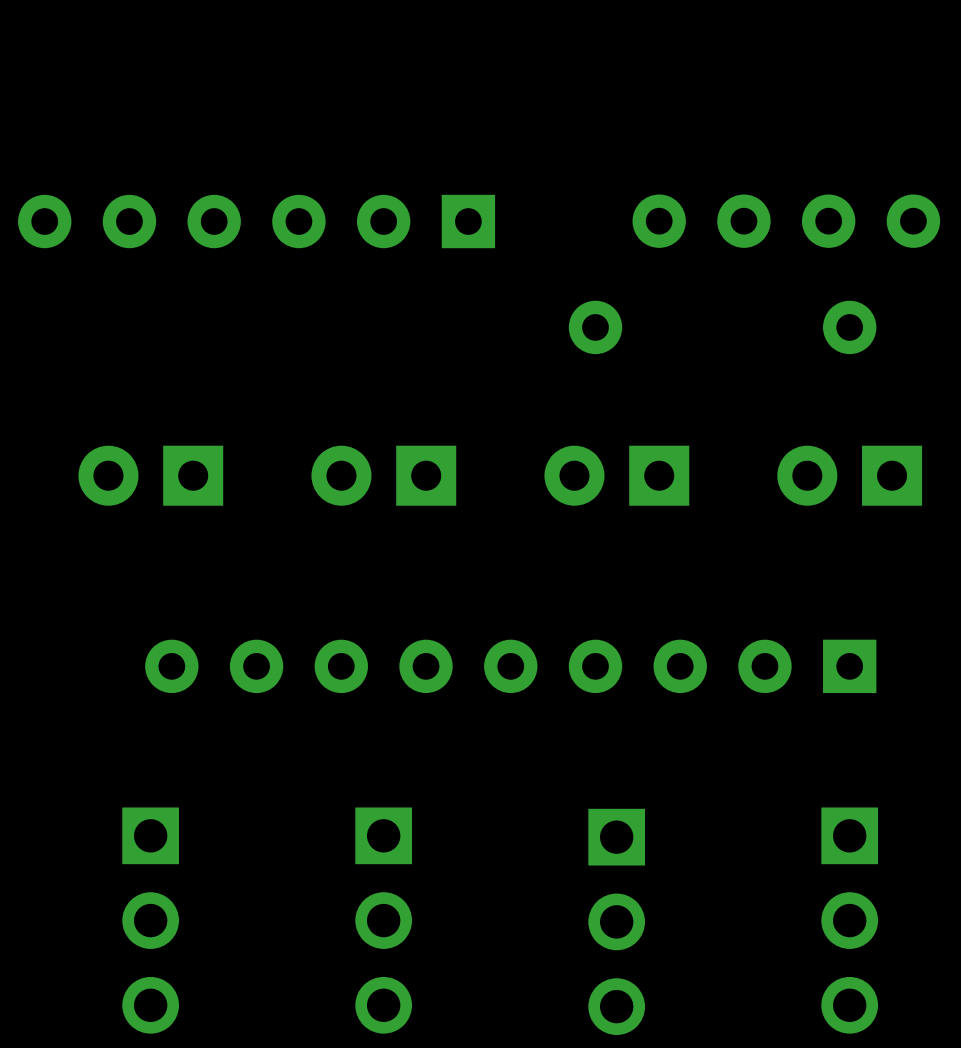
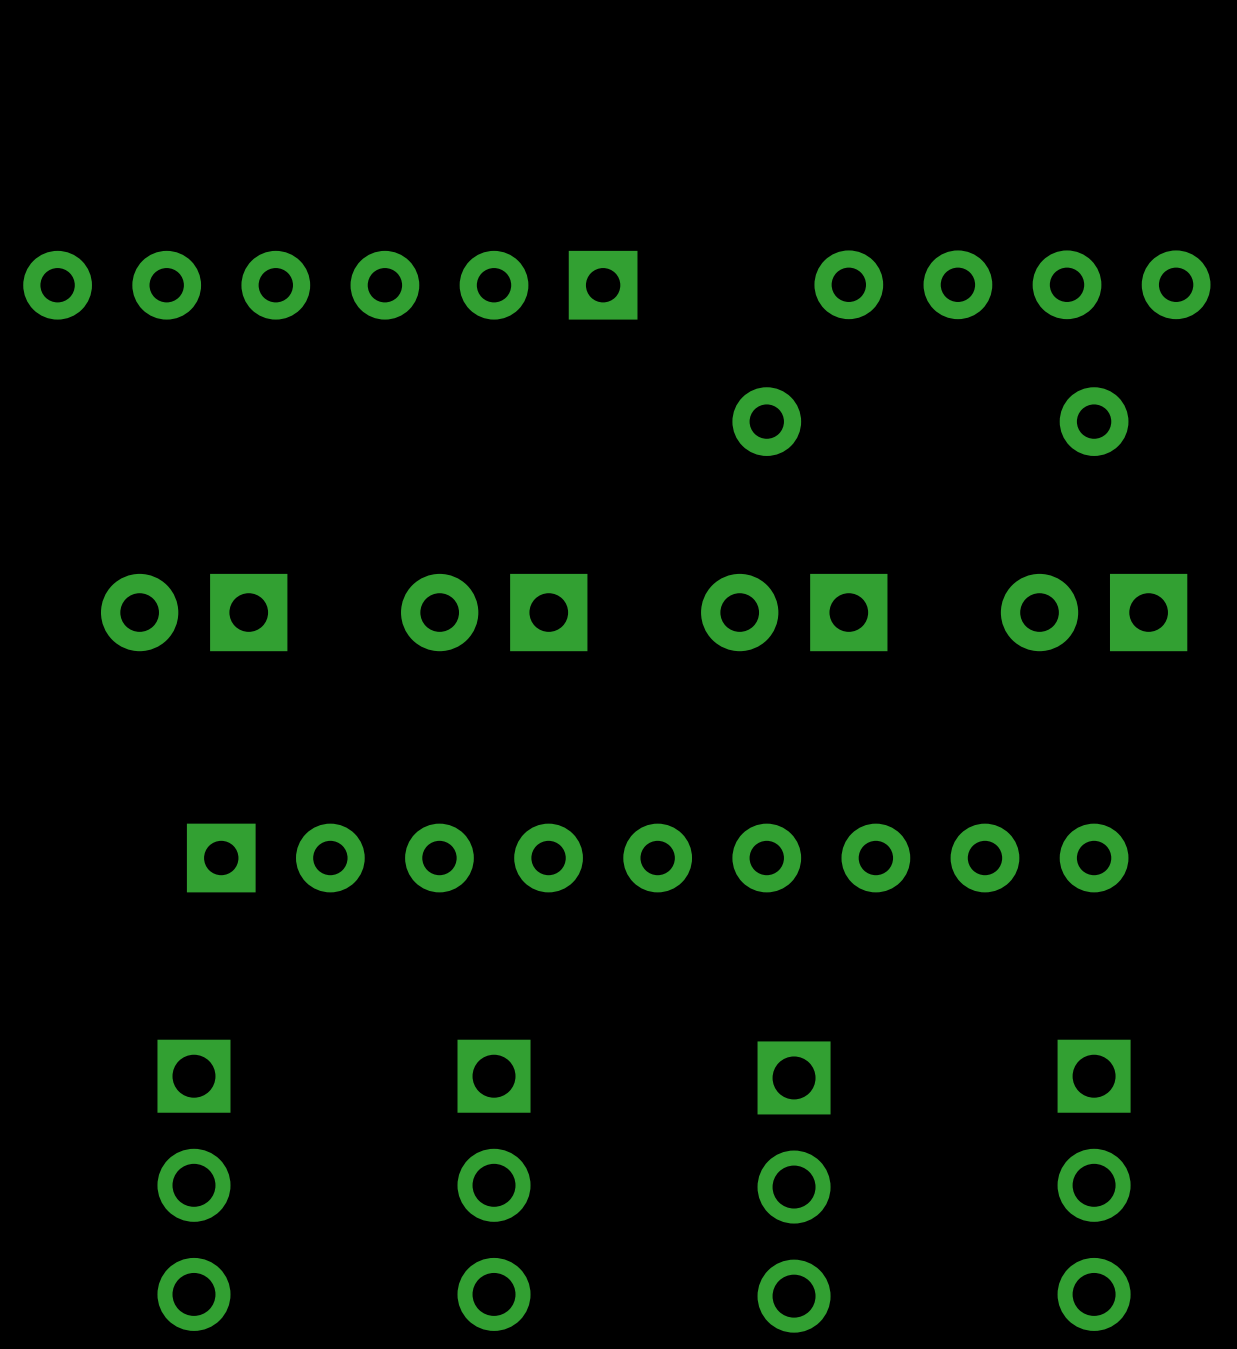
part rotation: 0° (510, 666) -> 180° (657, 858)

